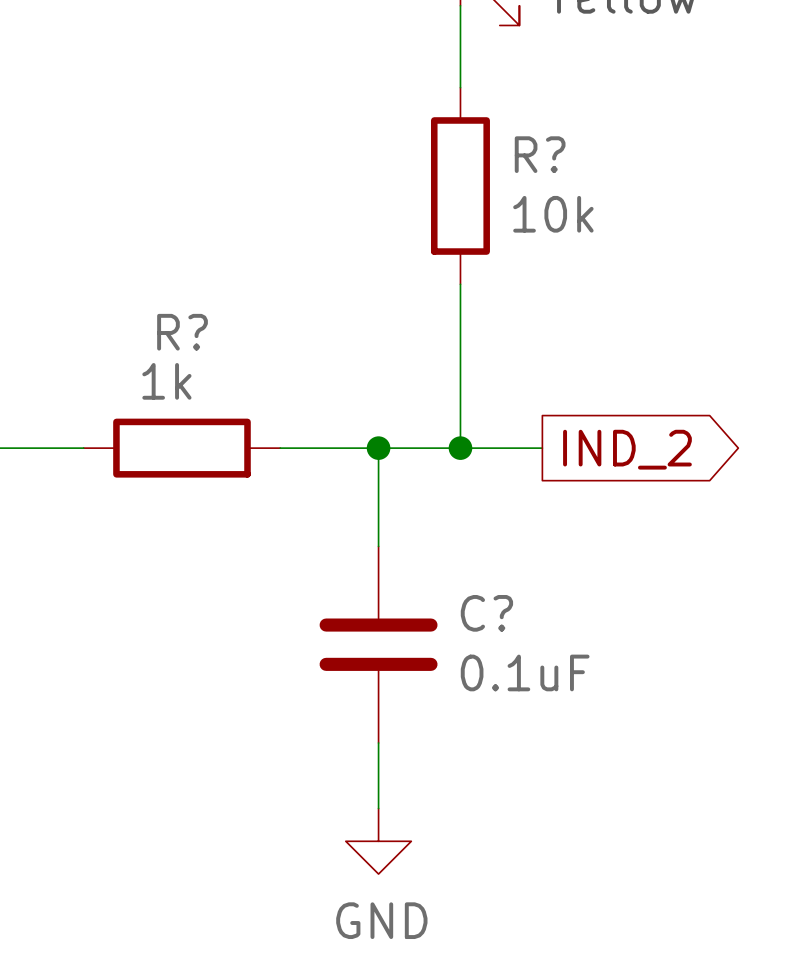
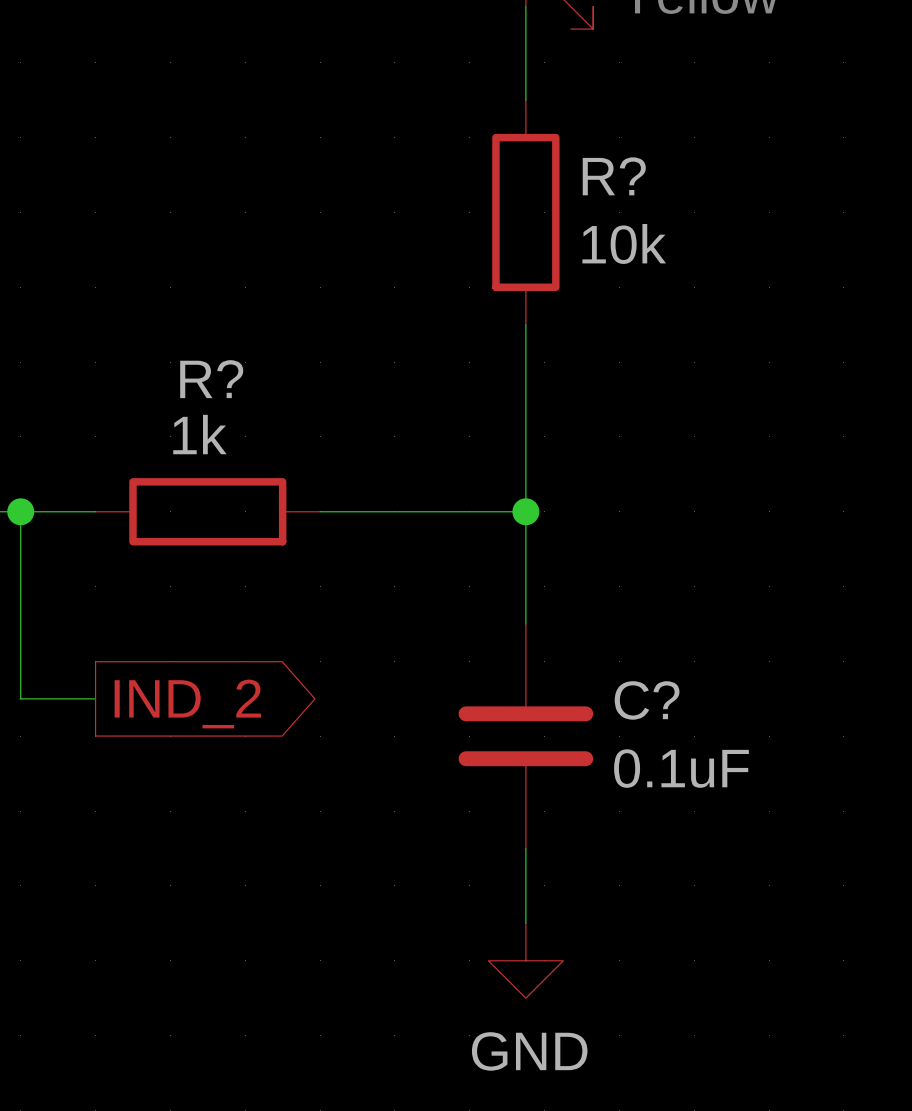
wire: none -> (20, 511) (20, 698) (95, 698)
junction: none -> (20, 511)
wire: (378, 448) (378, 546) -> none
junction: (378, 448) -> none
wire: (460, 448) (542, 448) -> (525, 511) (525, 624)
global label position: IND_2 (627, 449) -> IND_2 (187, 704)
C? position: (378, 644) -> (525, 736)
wire: (378, 743) (378, 808) -> (525, 848) (525, 923)
power symbol position: GND (378, 841) -> GND (525, 960)

